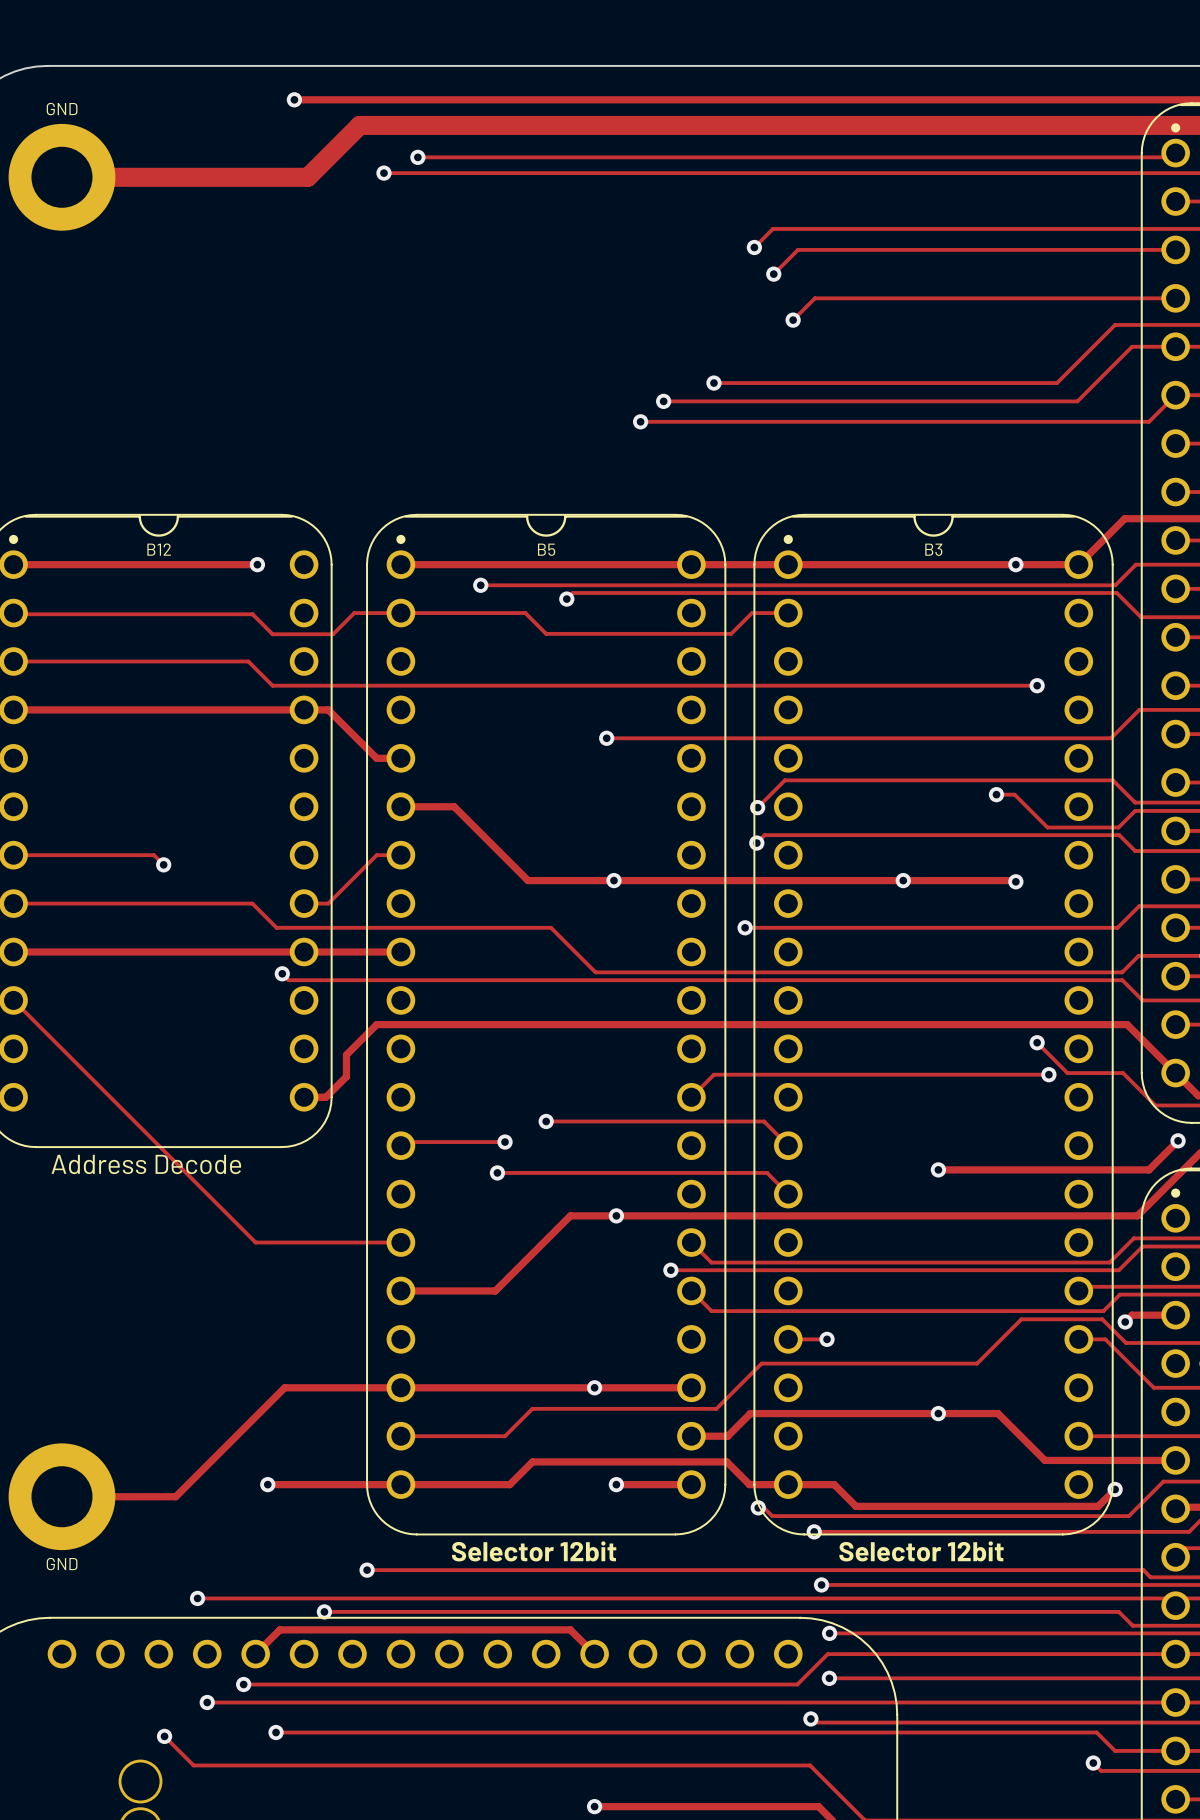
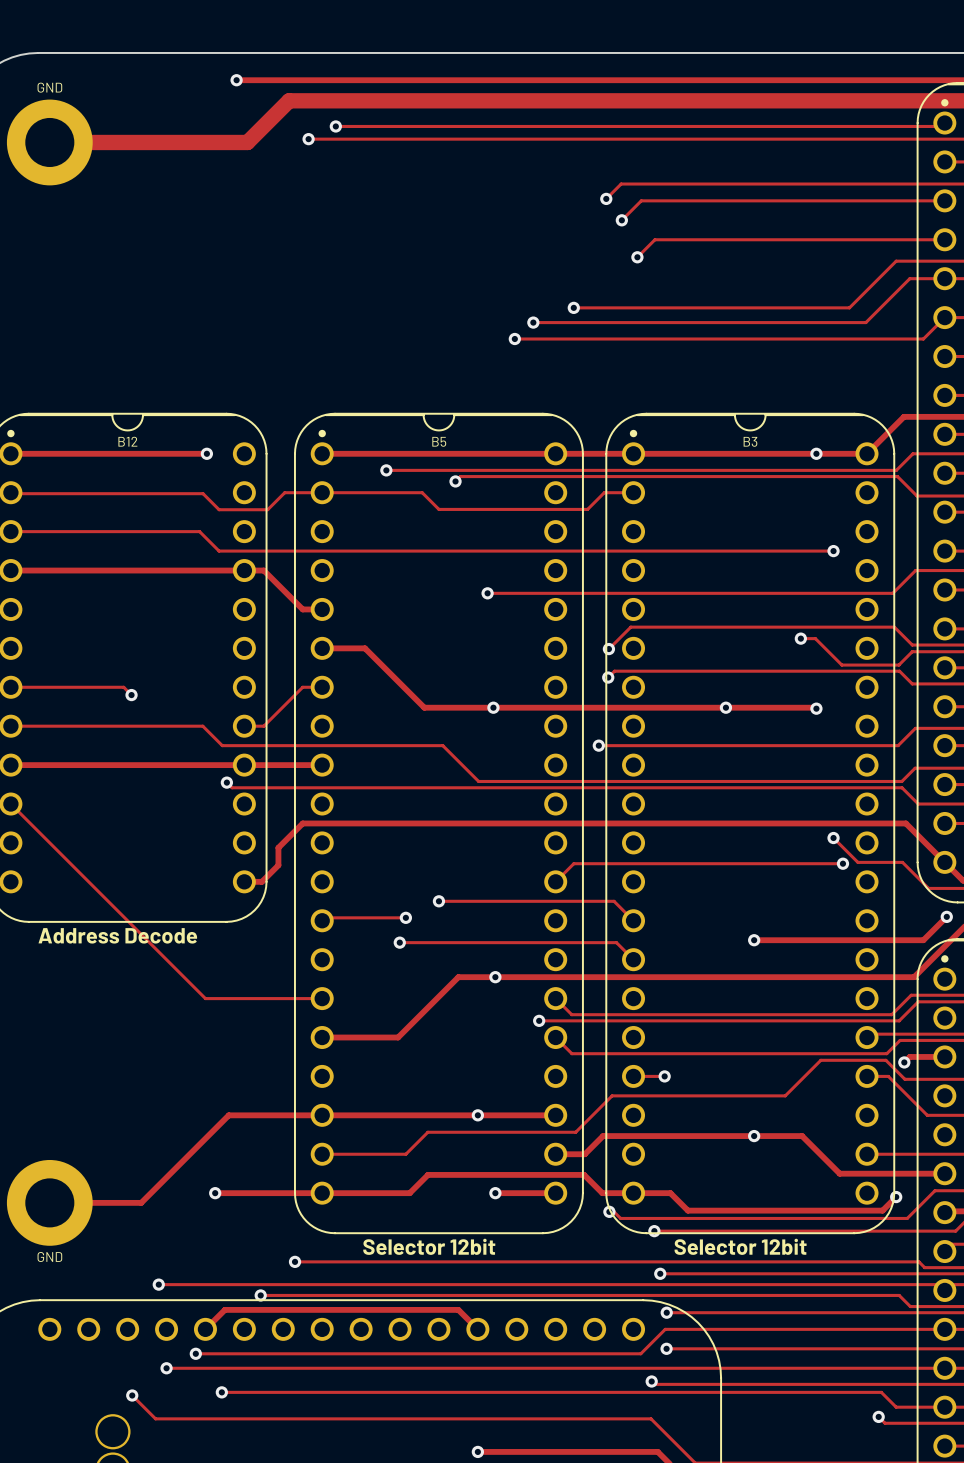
B12 text: none -> Address Decode (117, 935)
B12 text: Address Decode (146, 1164) -> none

